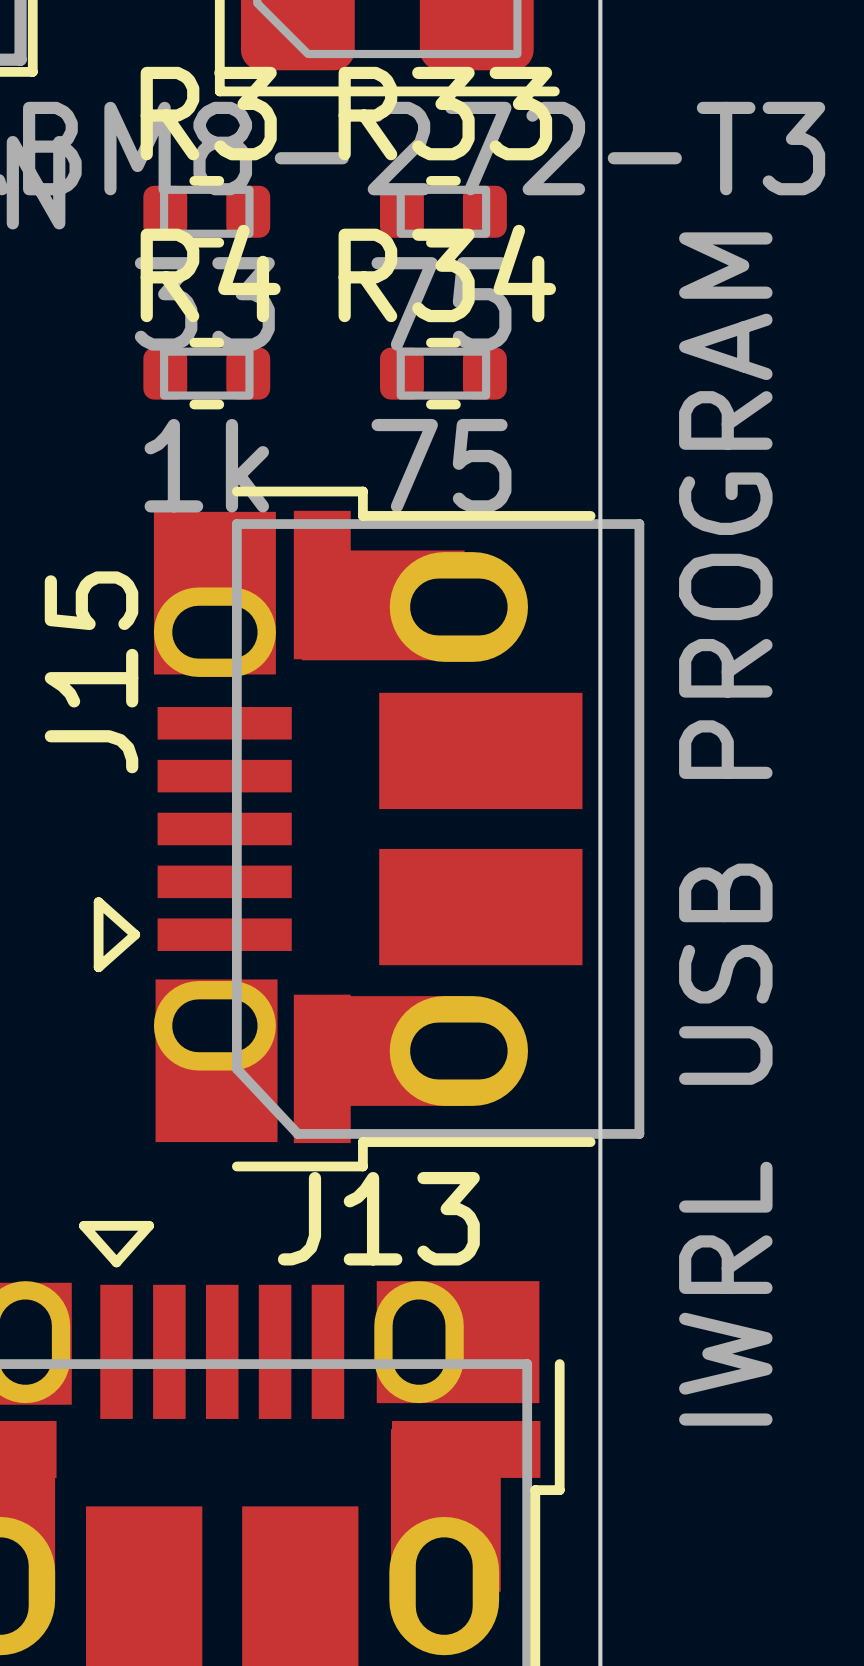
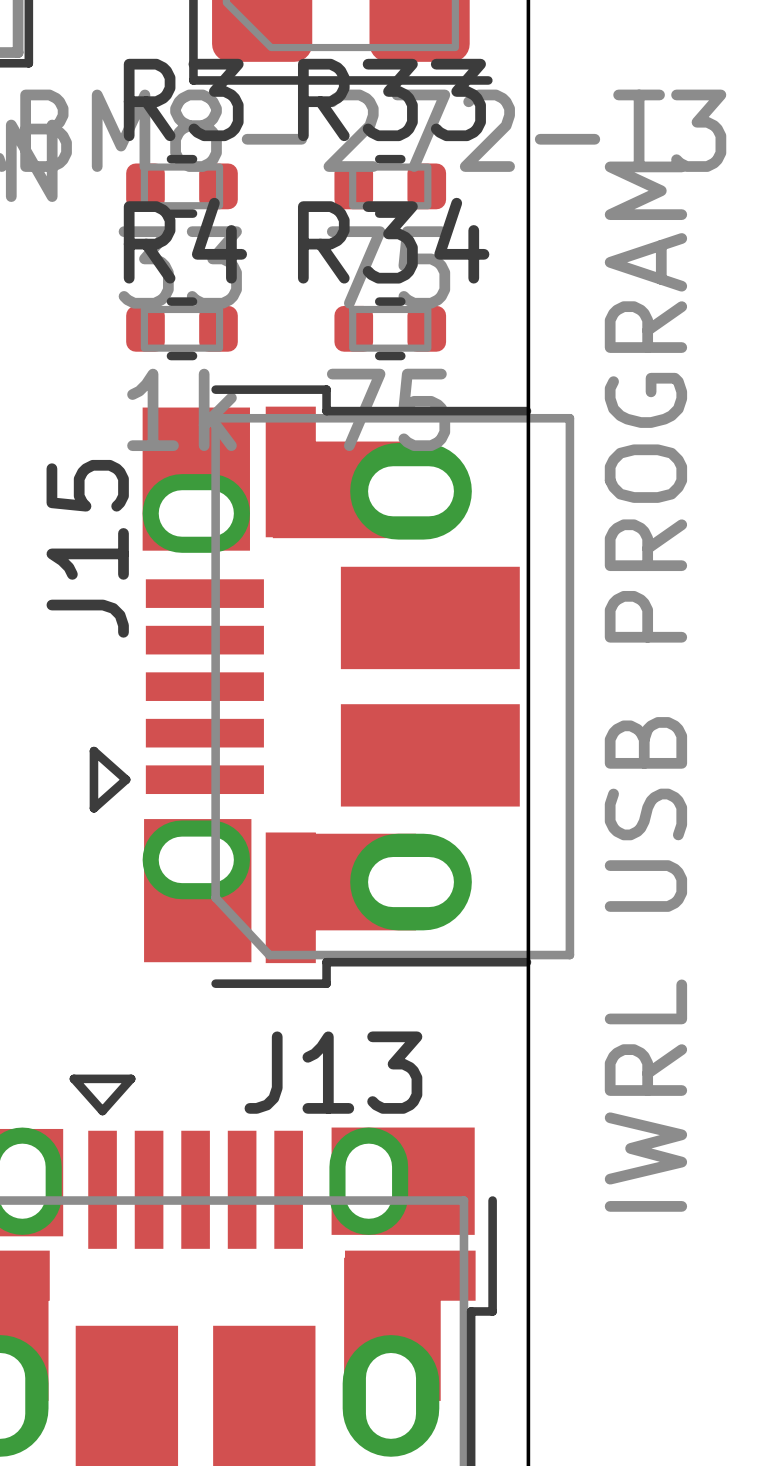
J15 position: (369, 828) -> (331, 686)

